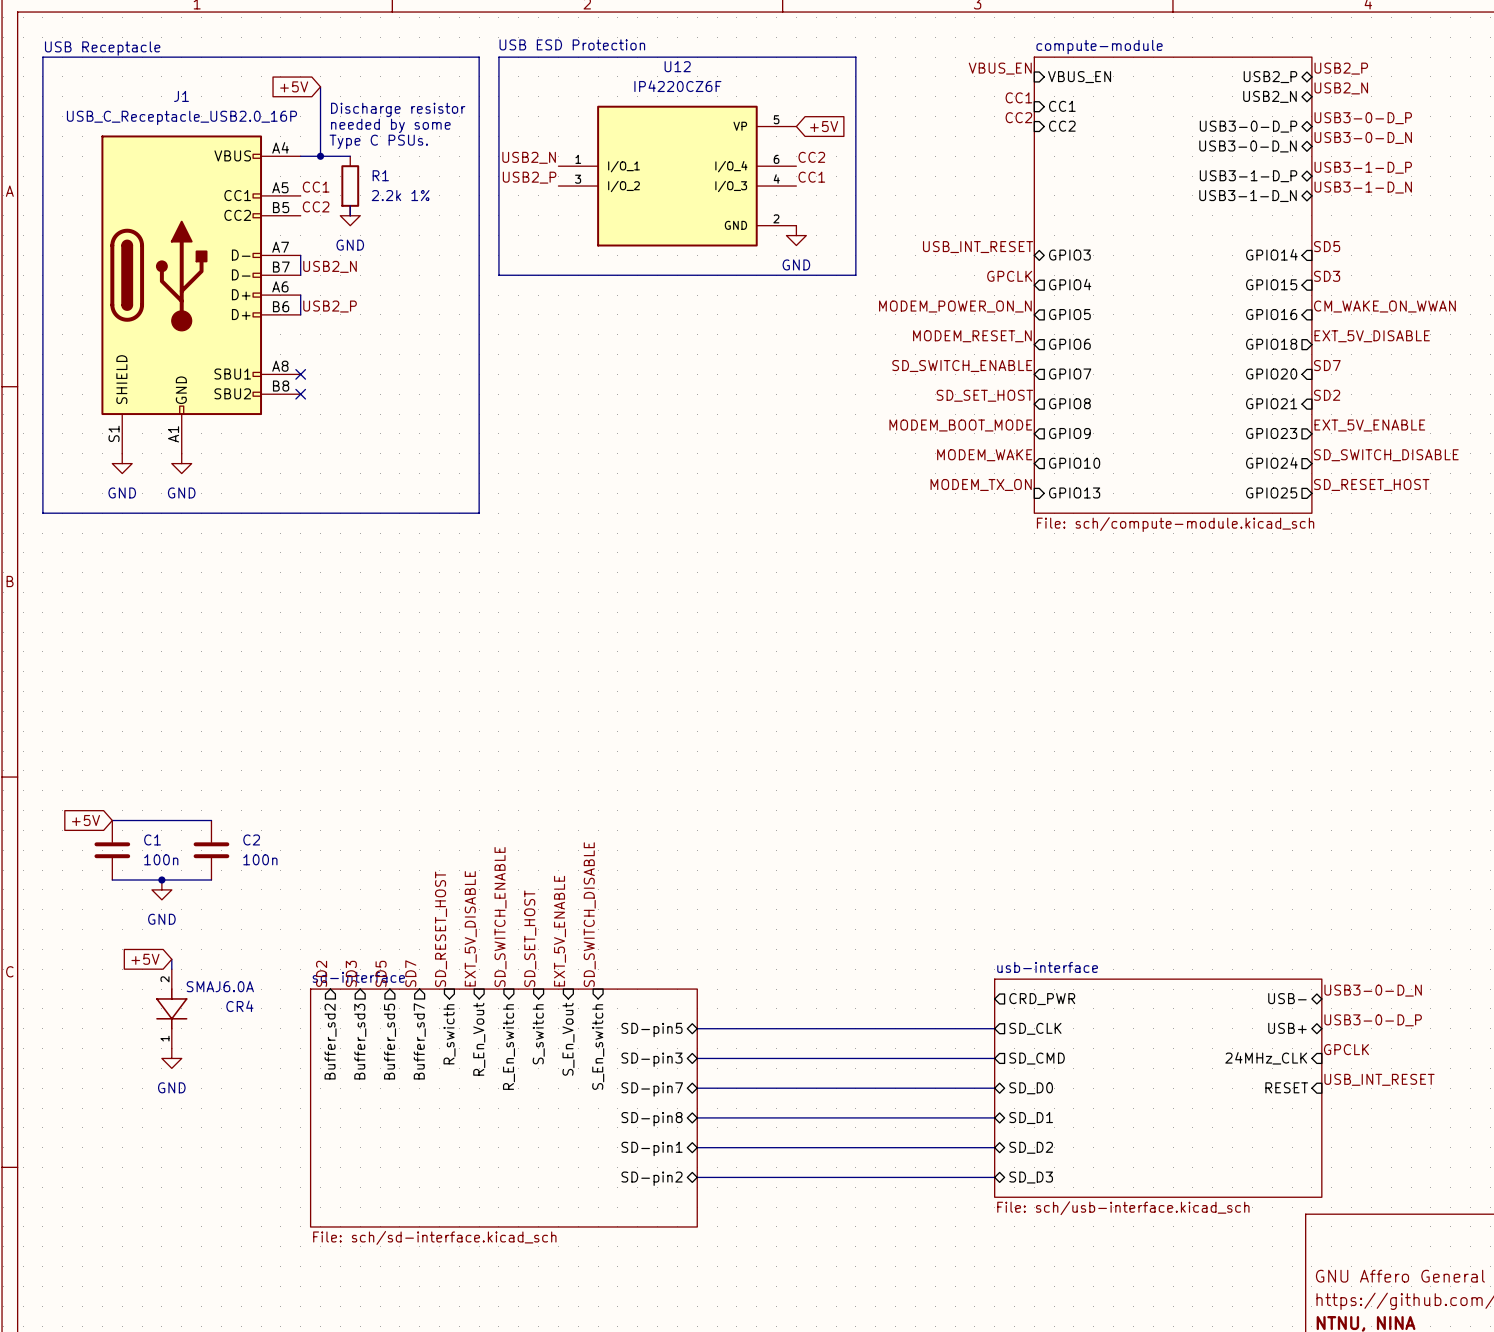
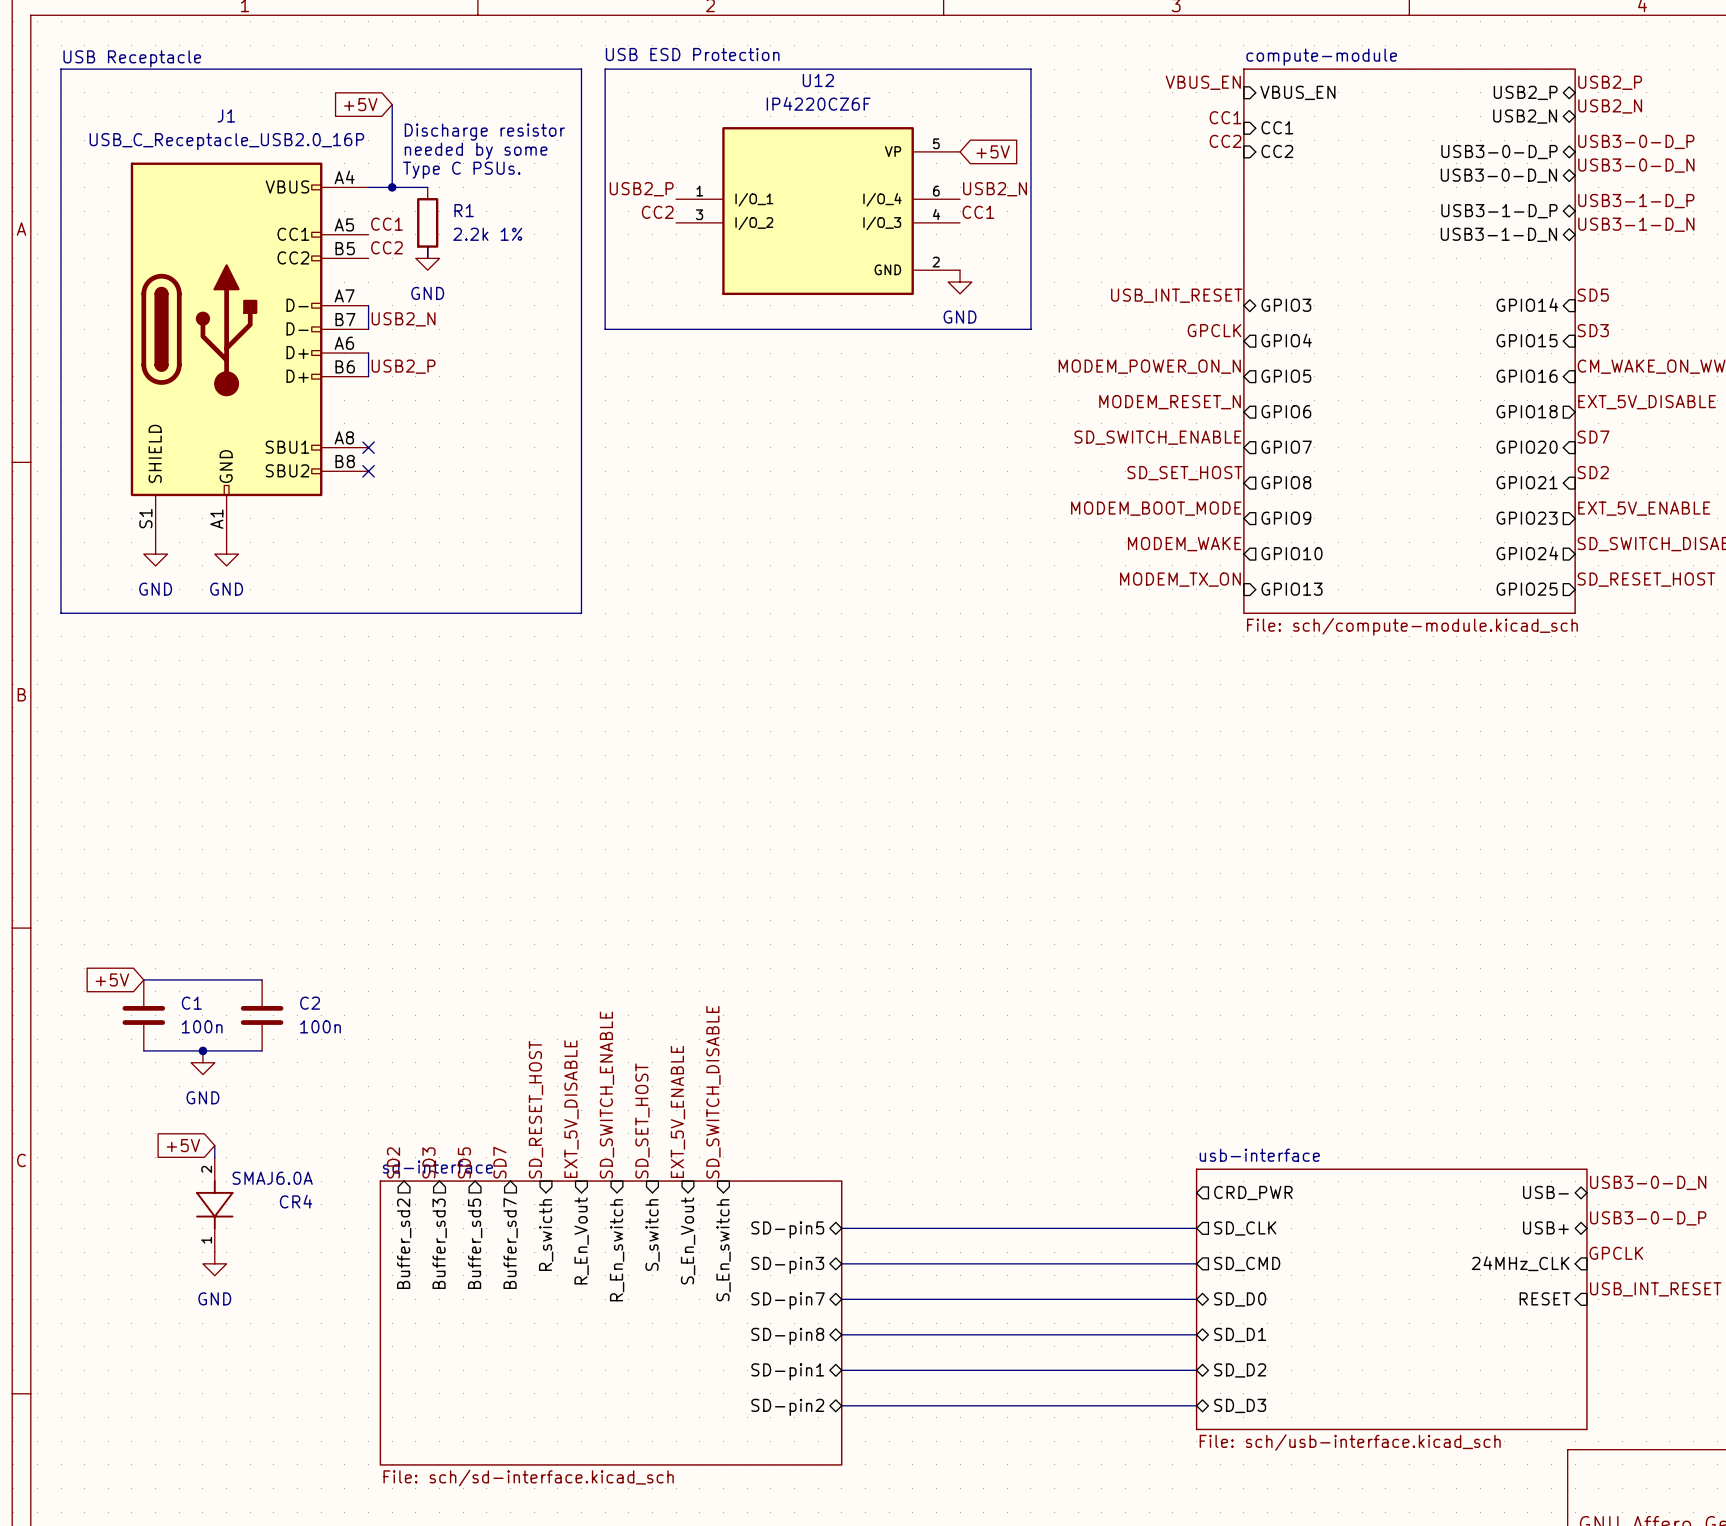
label: USB2_N (529, 157) -> USB2_P (641, 189)
label: CC2 (811, 157) -> USB2_N (995, 189)
label: USB2_P (529, 177) -> CC2 (657, 212)

